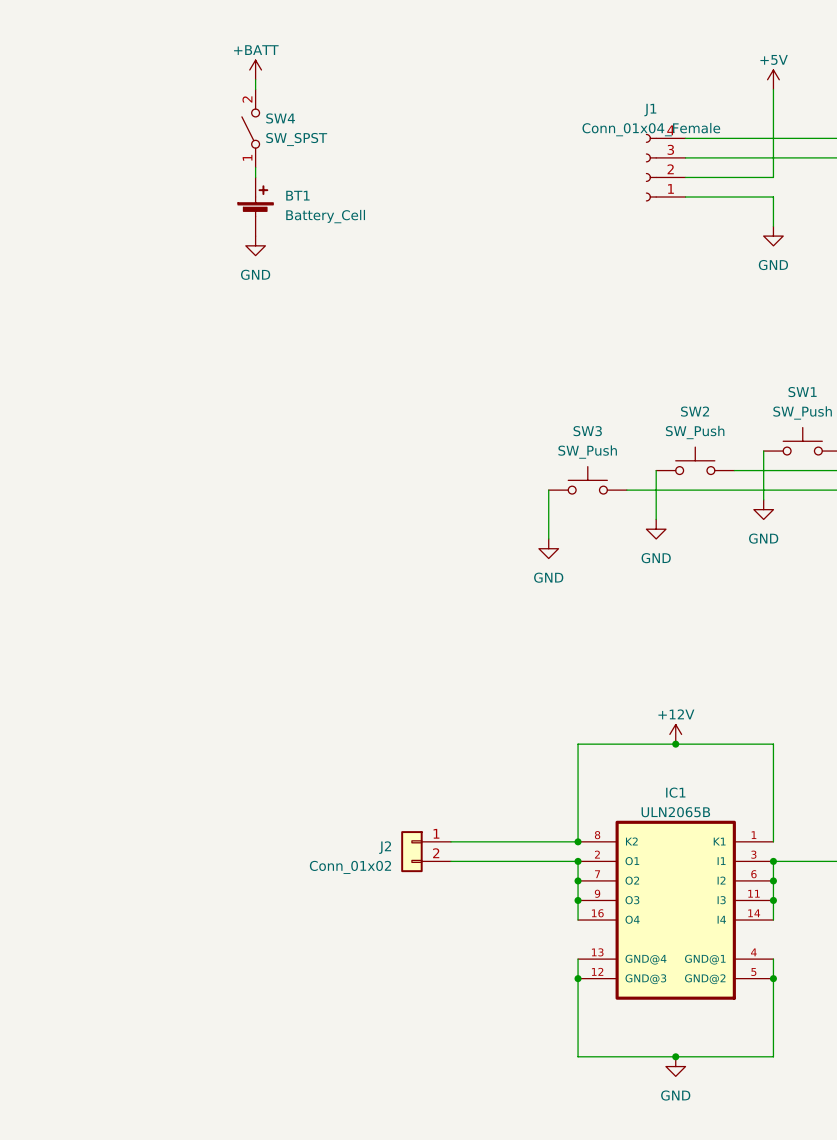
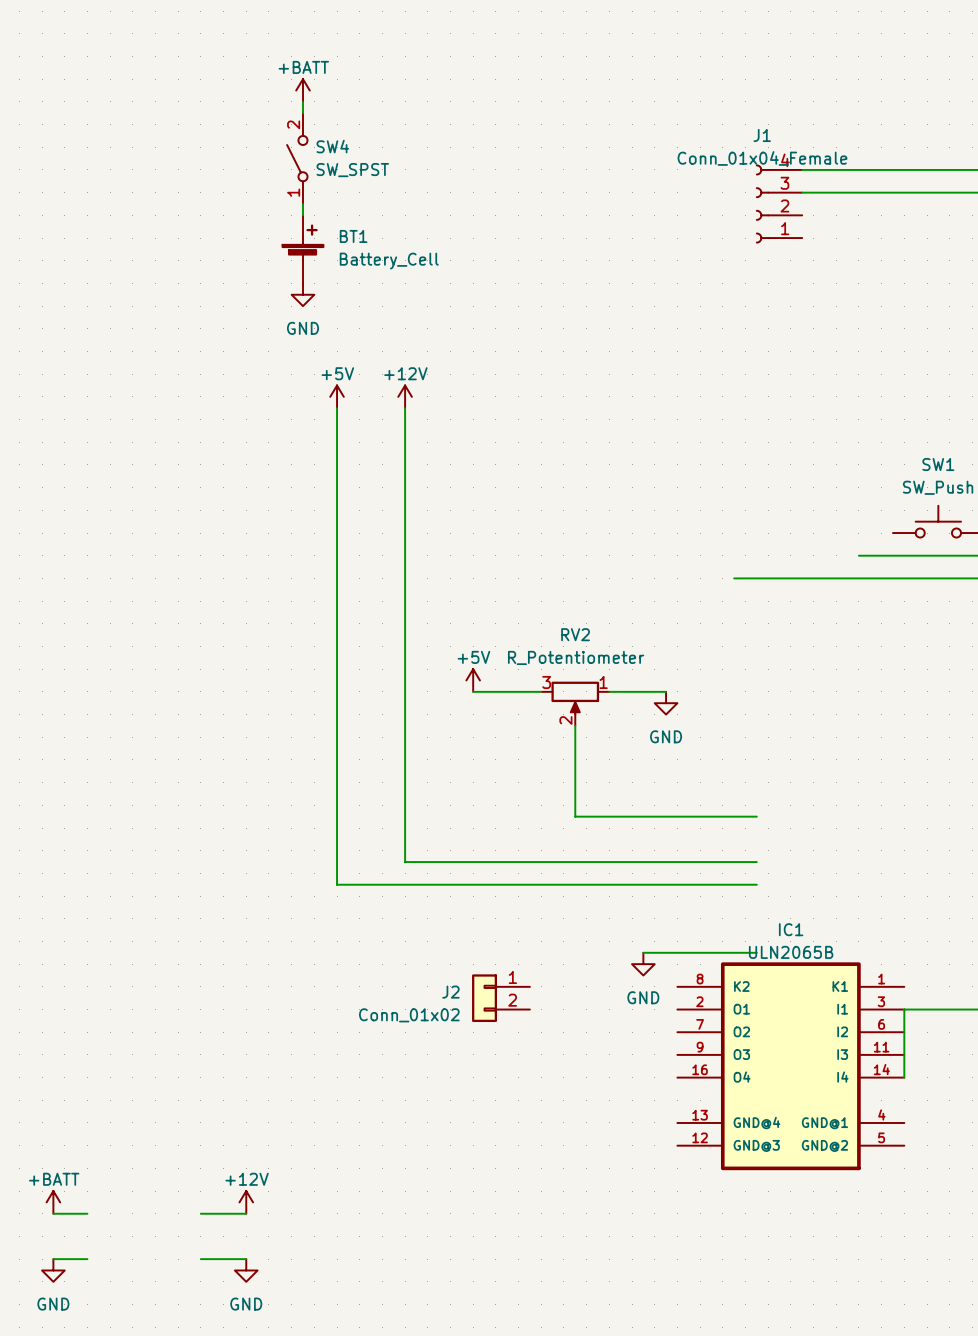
power symbol: +5V (773, 79) -> none
wire: (773, 89) (773, 177) (685, 177) -> none
wire: (685, 197) (773, 197) (773, 226) -> none
power symbol: GND (773, 236) -> none
power symbol: none -> +5V (337, 396)
power symbol: none -> +12V (405, 396)
wire: none -> (337, 408) (337, 884) (756, 884)
wire: none -> (405, 408) (405, 862) (756, 862)
wire: (763, 451) (763, 499) -> none
SW2: SW_Push (695, 460) -> none
wire: (656, 470) (656, 519) -> none
SW3: SW_Push (587, 480) -> none
wire: (548, 490) (548, 538) -> none
power symbol: GND (763, 509) -> none
power symbol: GND (656, 529) -> none
power symbol position: GND (548, 548) -> GND (666, 703)
power symbol: none -> +5V (473, 680)
wire: none -> (473, 691) (541, 691)
wire: none -> (609, 691) (666, 691)
RV2: none -> R_Potentiometer (575, 703)
wire: none -> (575, 725) (575, 816) (756, 816)
power symbol: +12V (675, 734) -> none
junction: (675, 744) -> none
wire: none -> (643, 952) (756, 952)
power symbol: none -> GND (643, 964)
wire: (451, 841) (578, 841) (578, 744) (773, 744) (773, 841) -> none
junction: (578, 841) -> none
wire: (451, 861) (578, 861) (578, 920) -> none
junction: (578, 861) -> none
junction: (773, 861) -> none
junction: (578, 880) -> none
junction: (773, 880) -> none
junction: (578, 900) -> none
junction: (773, 900) -> none
wire: (578, 959) (578, 1056) (773, 1056) (773, 959) -> none
junction: (578, 978) -> none
junction: (773, 978) -> none
power symbol: none -> +BATT (53, 1202)
power symbol: none -> +12V (246, 1202)
wire: none -> (53, 1213) (87, 1213)
wire: none -> (200, 1213) (246, 1213)
junction: (675, 1056) -> none
power symbol: GND (675, 1066) -> none
wire: none -> (53, 1259) (87, 1259)
wire: none -> (200, 1259) (246, 1259)
power symbol: none -> GND (53, 1270)
power symbol: none -> GND (246, 1270)

